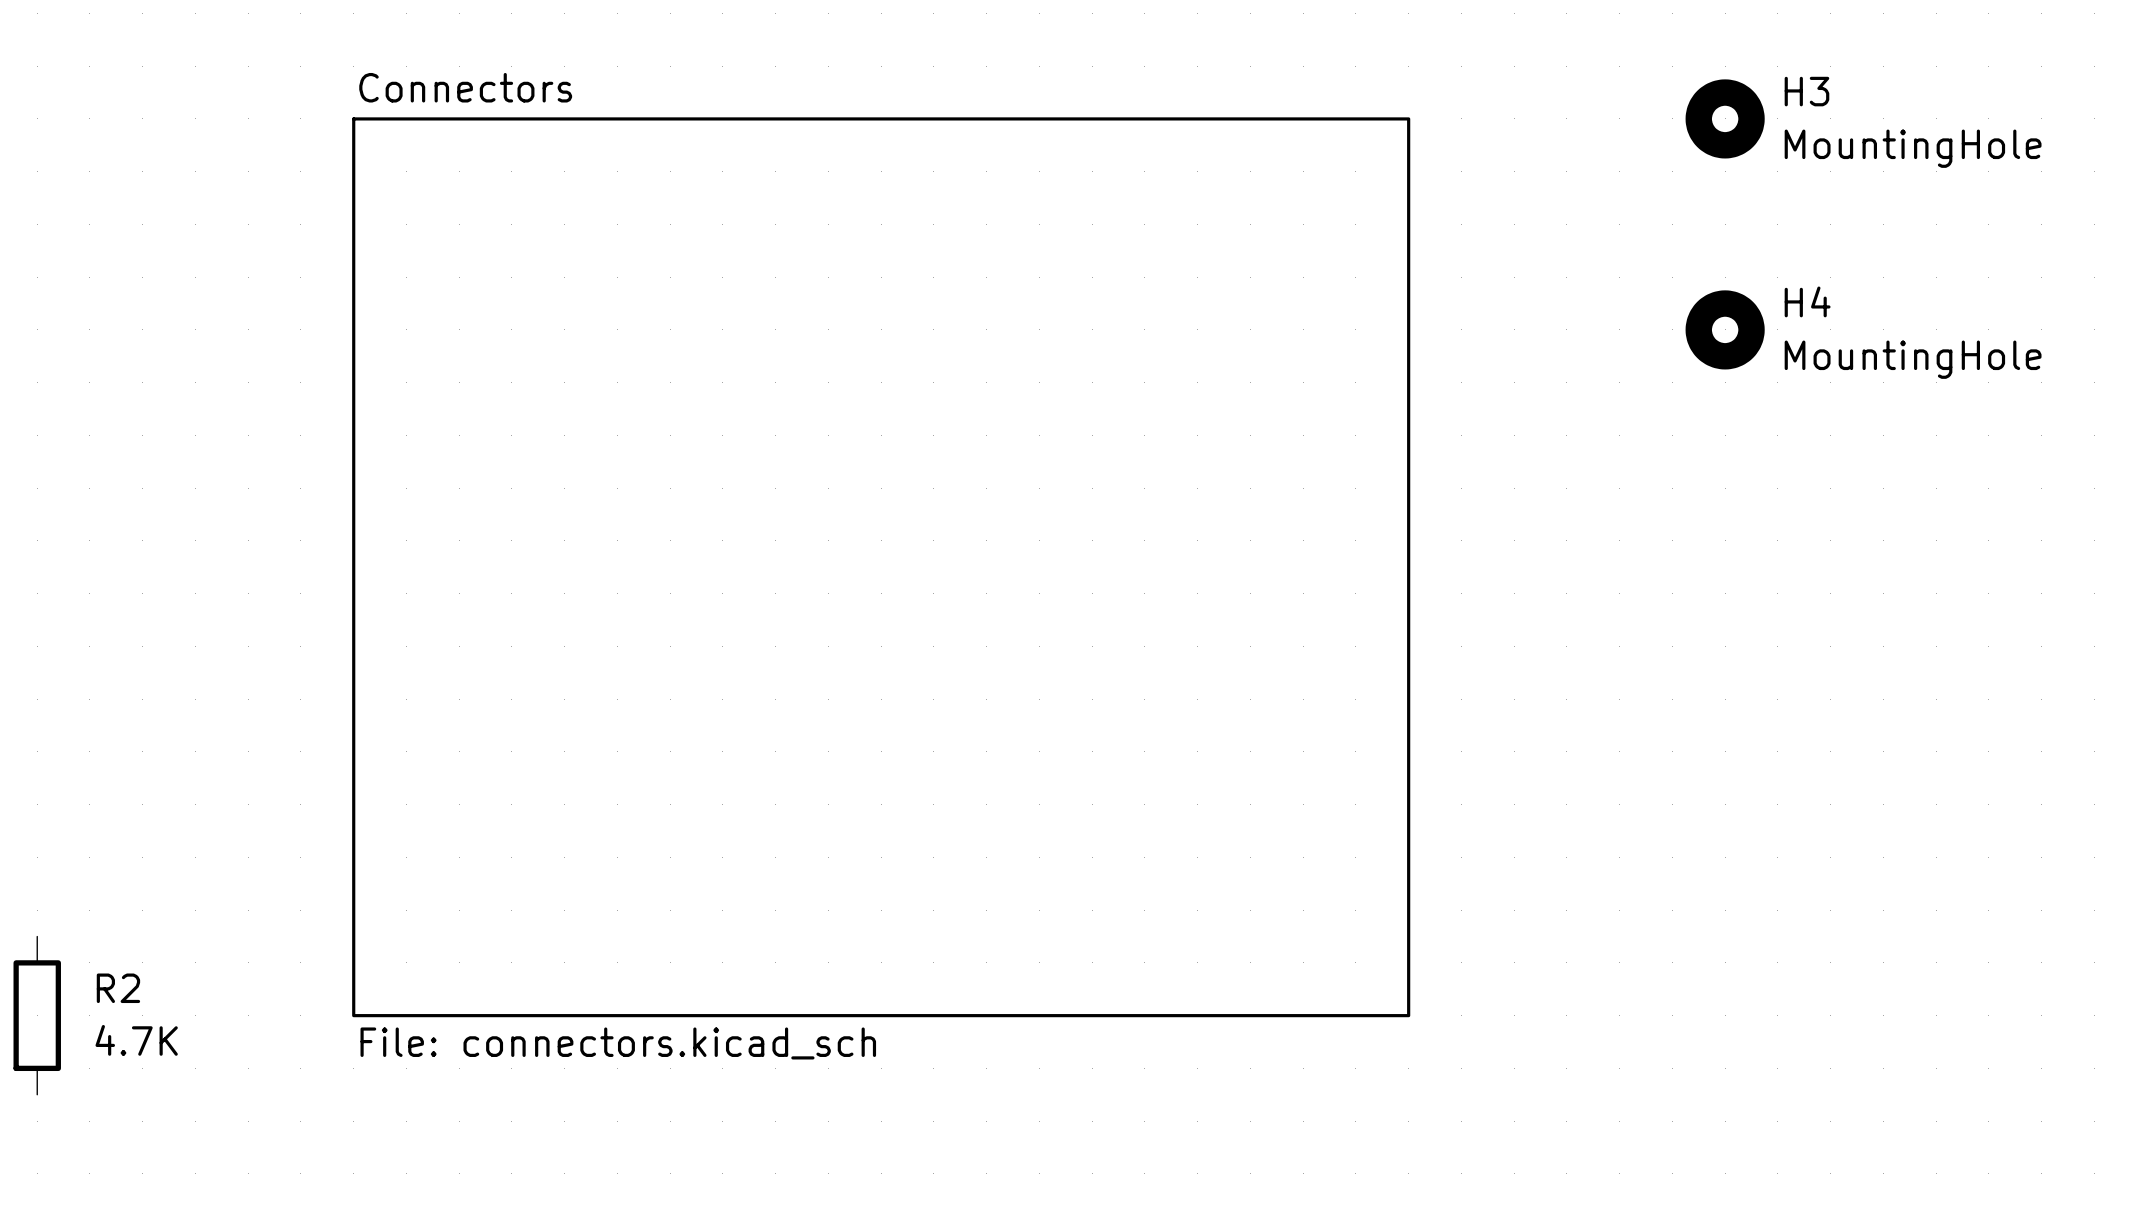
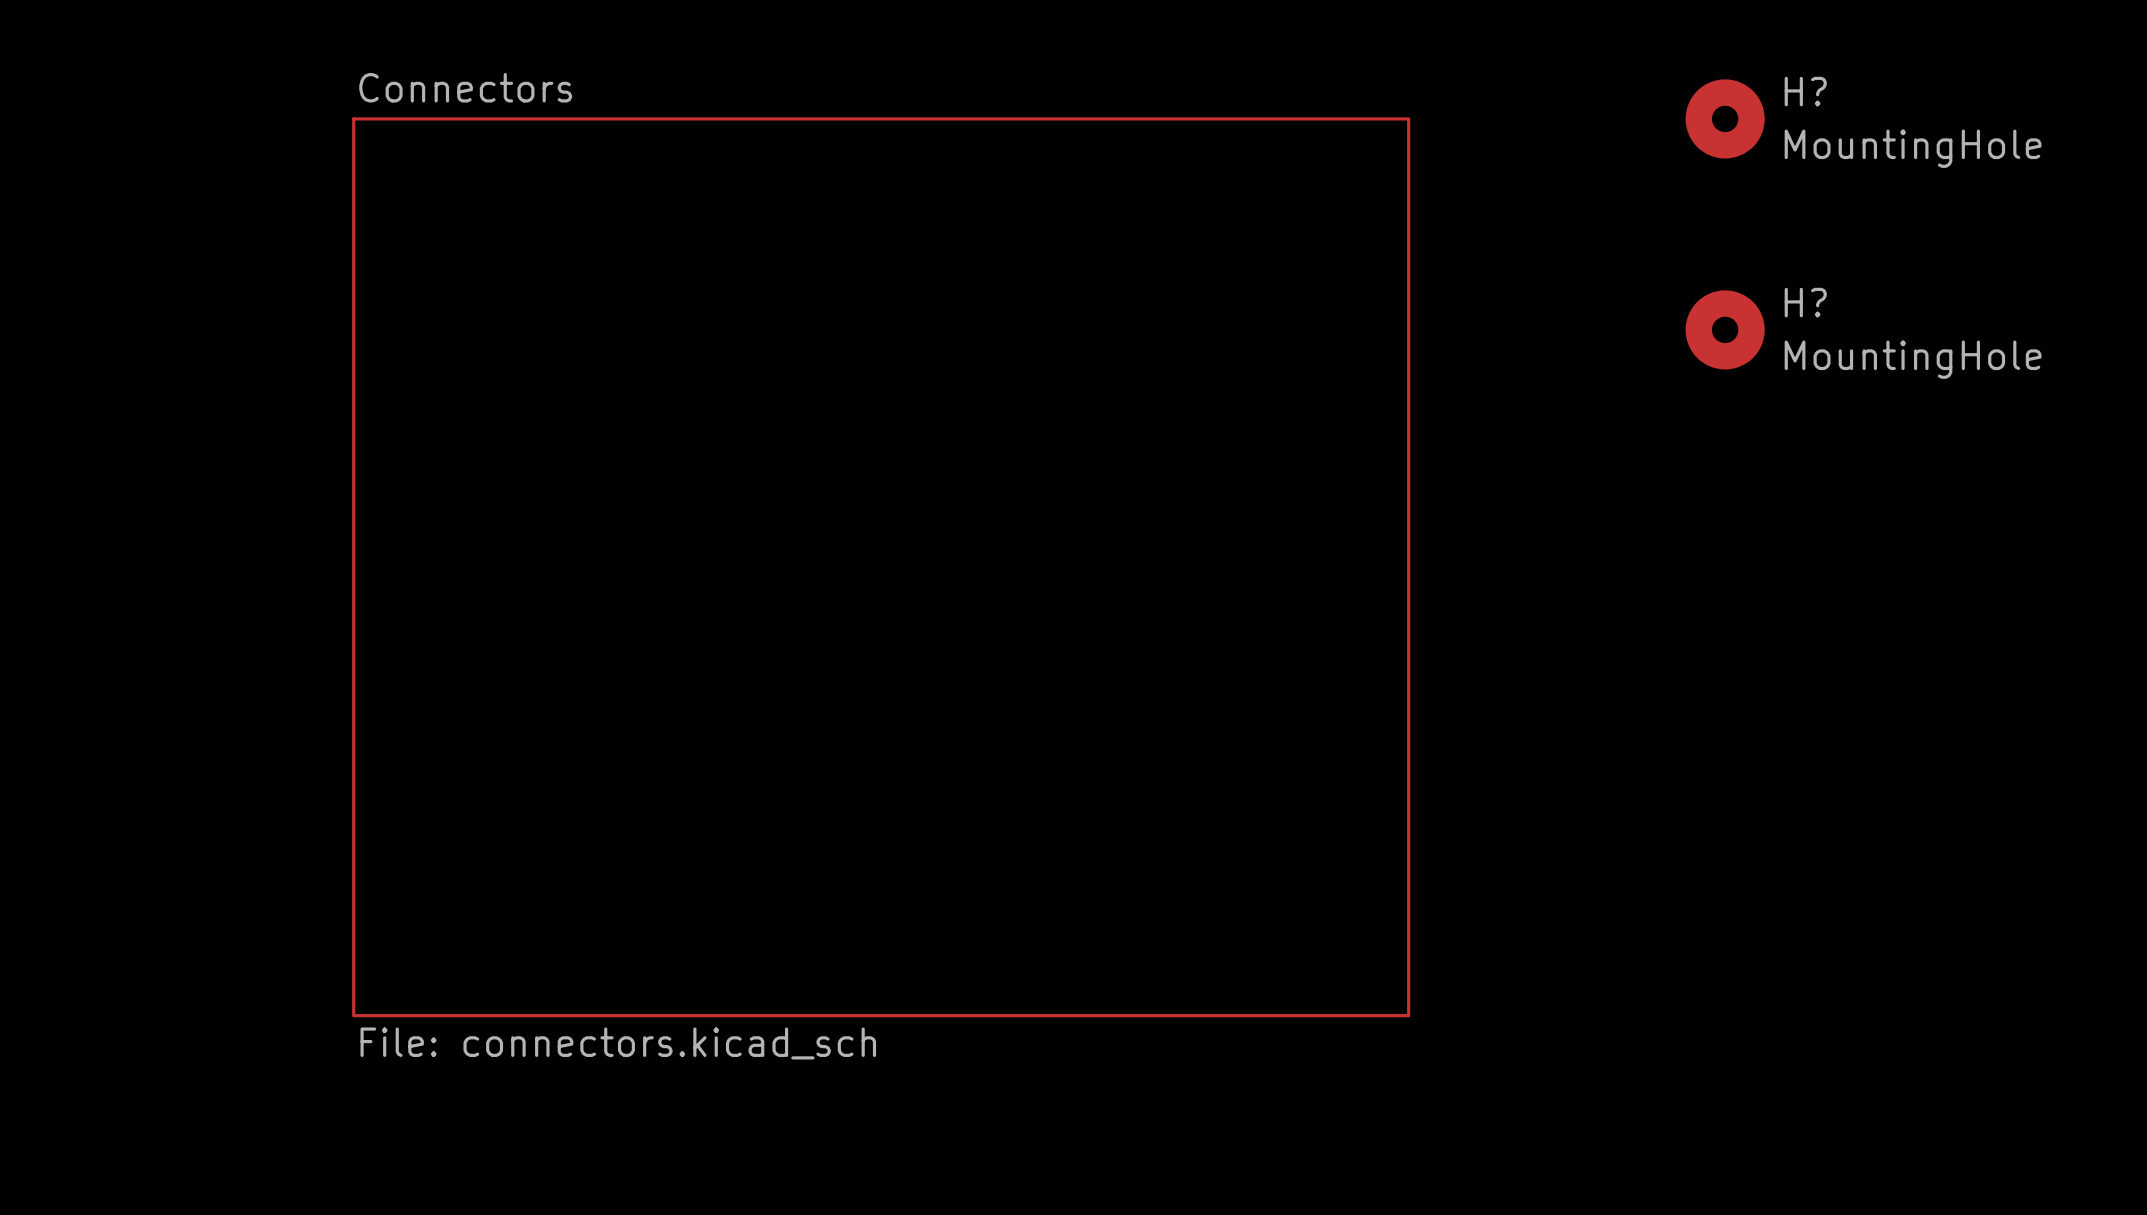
H3 name: H3 (1806, 91) -> H? (1805, 91)
H4 name: H4 (1807, 301) -> H? (1805, 302)
R2: 4.7K (37, 1015) -> none

